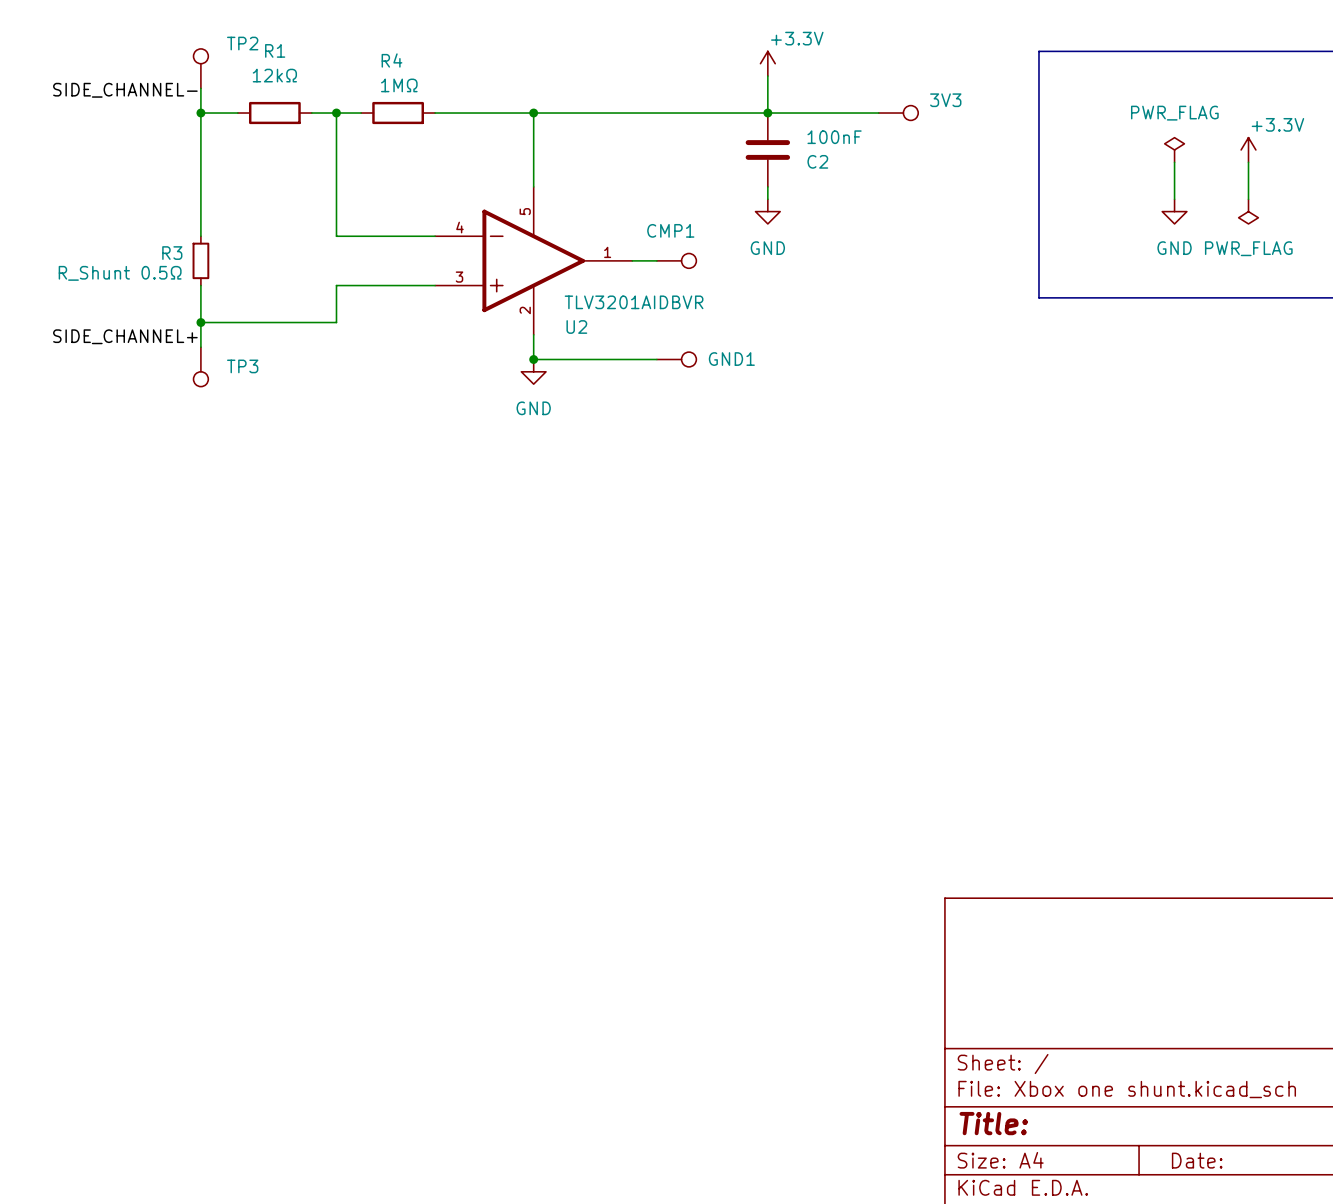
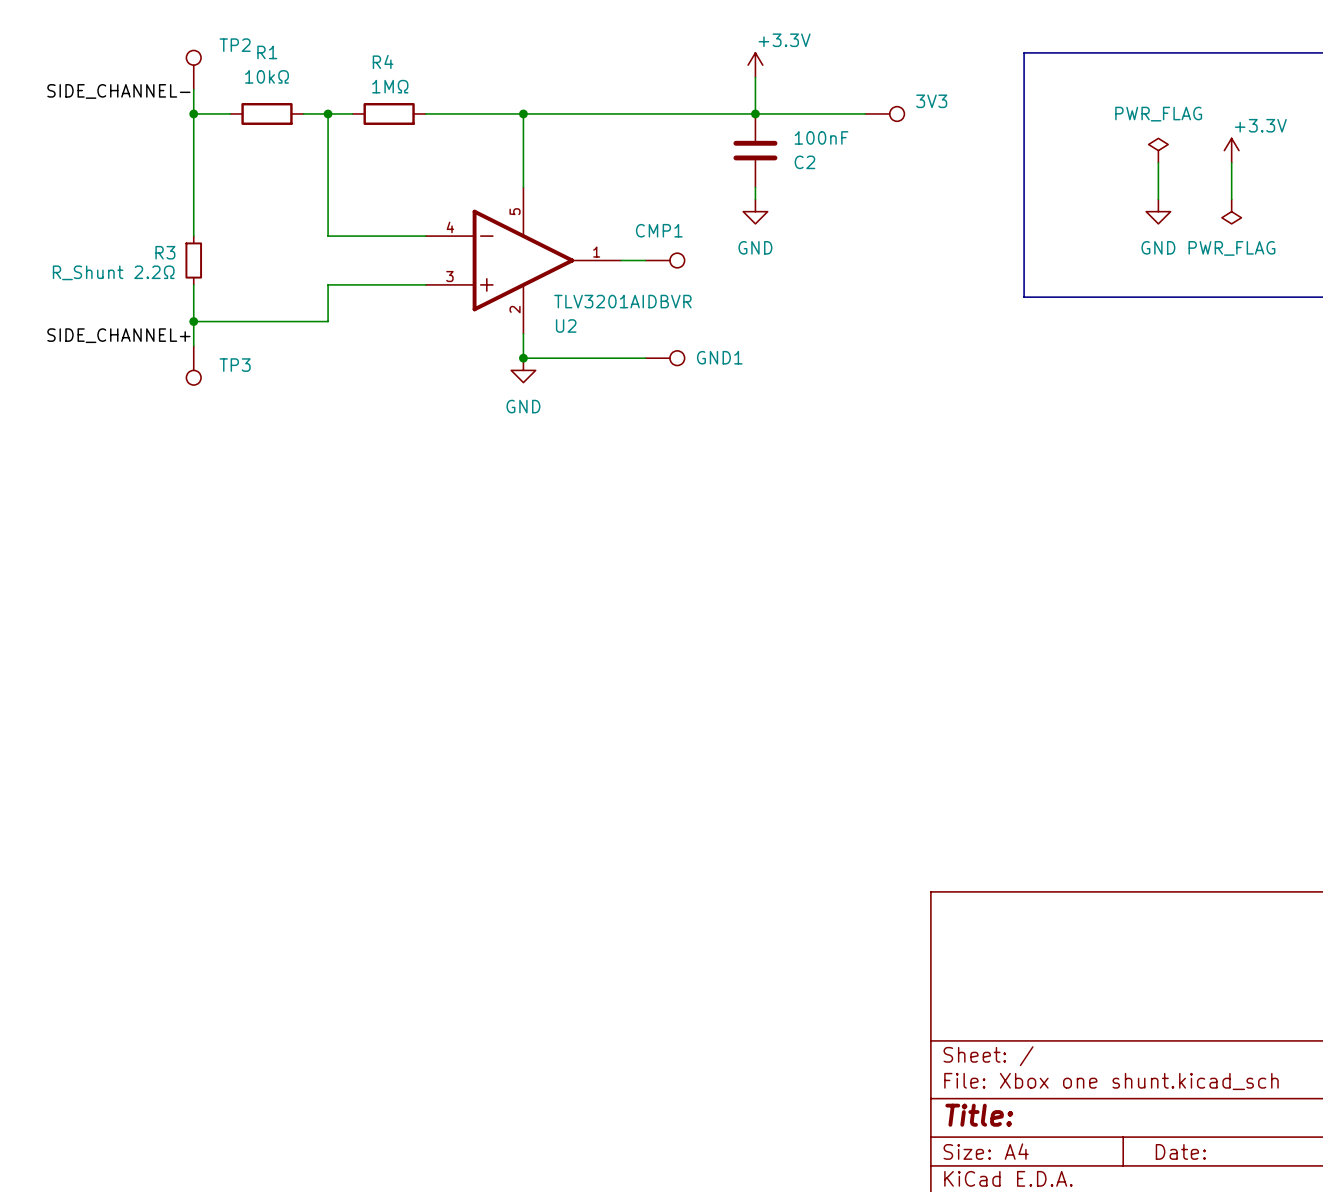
R1 value: 12kΩ (274, 75) -> 10kΩ (267, 76)
R3 value: R_Shunt 0.5Ω (120, 273) -> R_Shunt 2.2Ω (113, 272)

